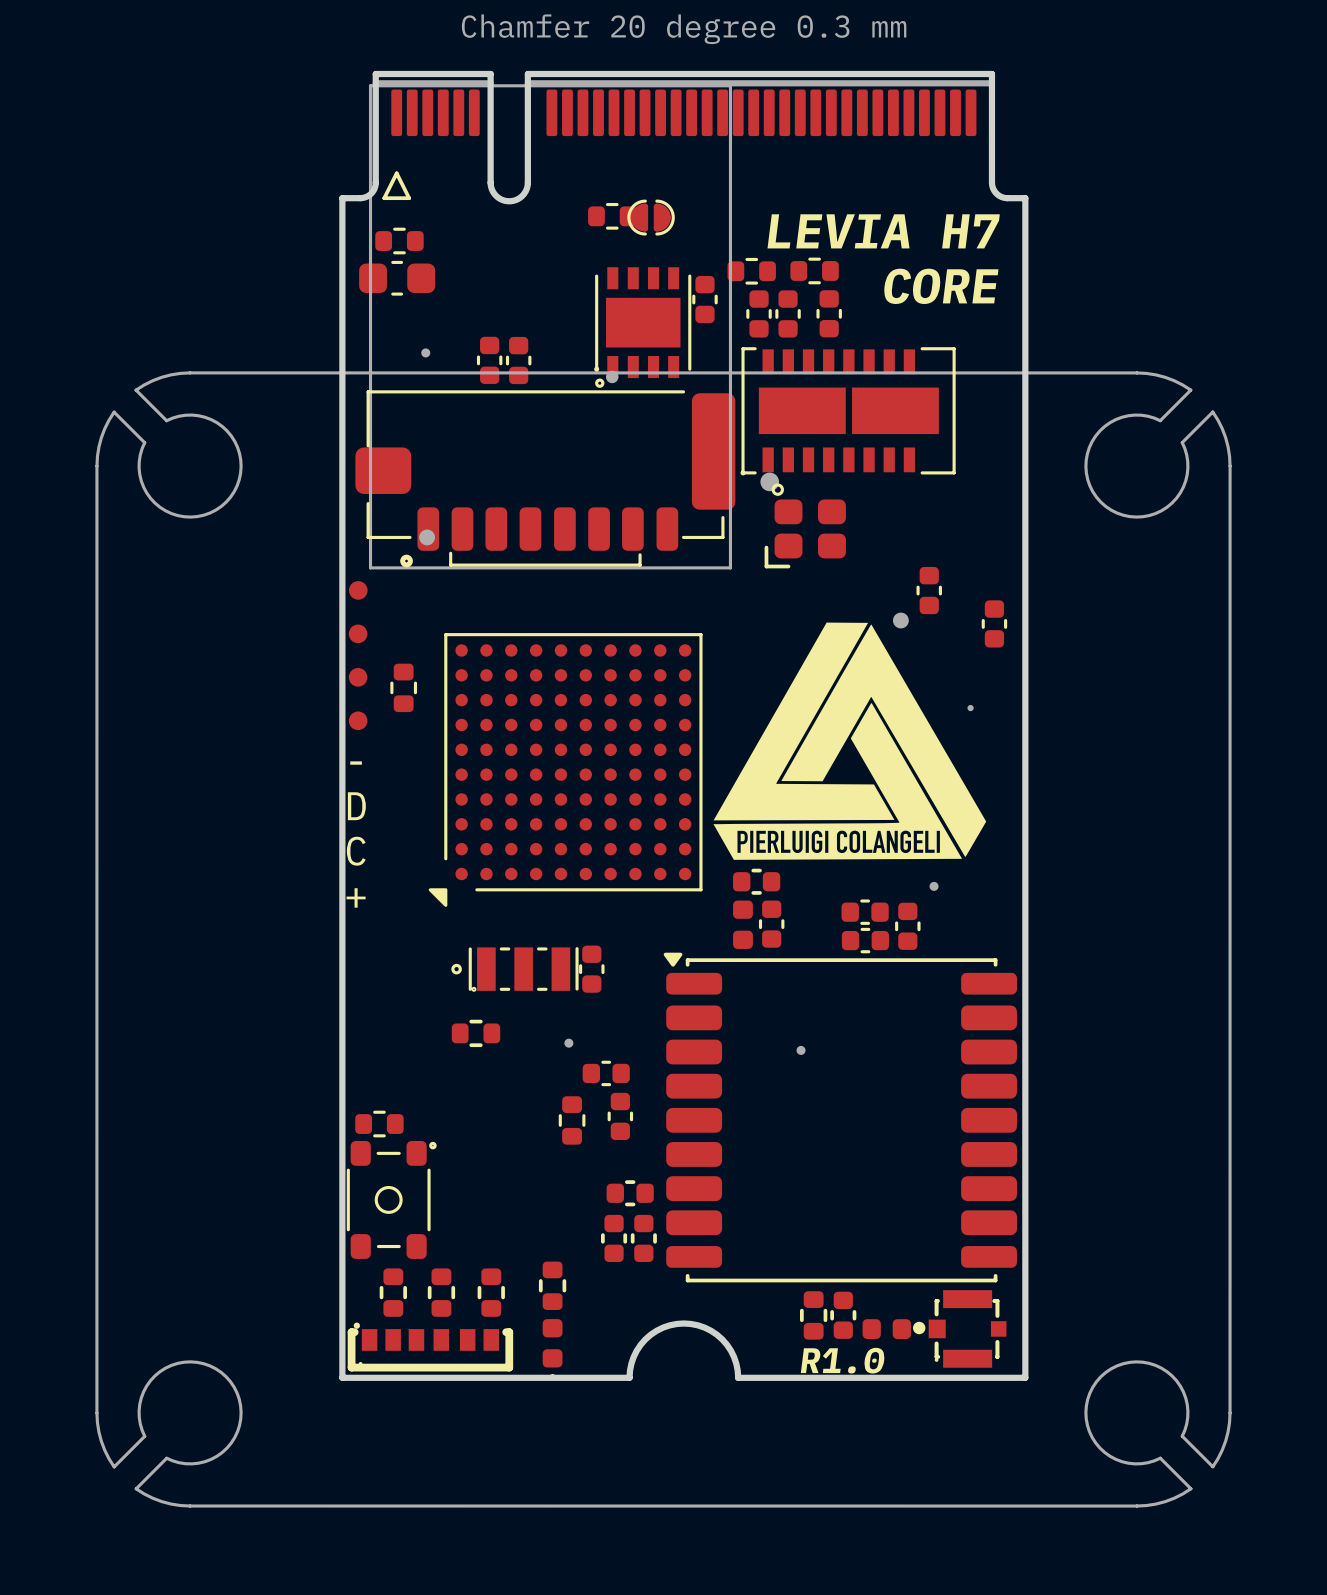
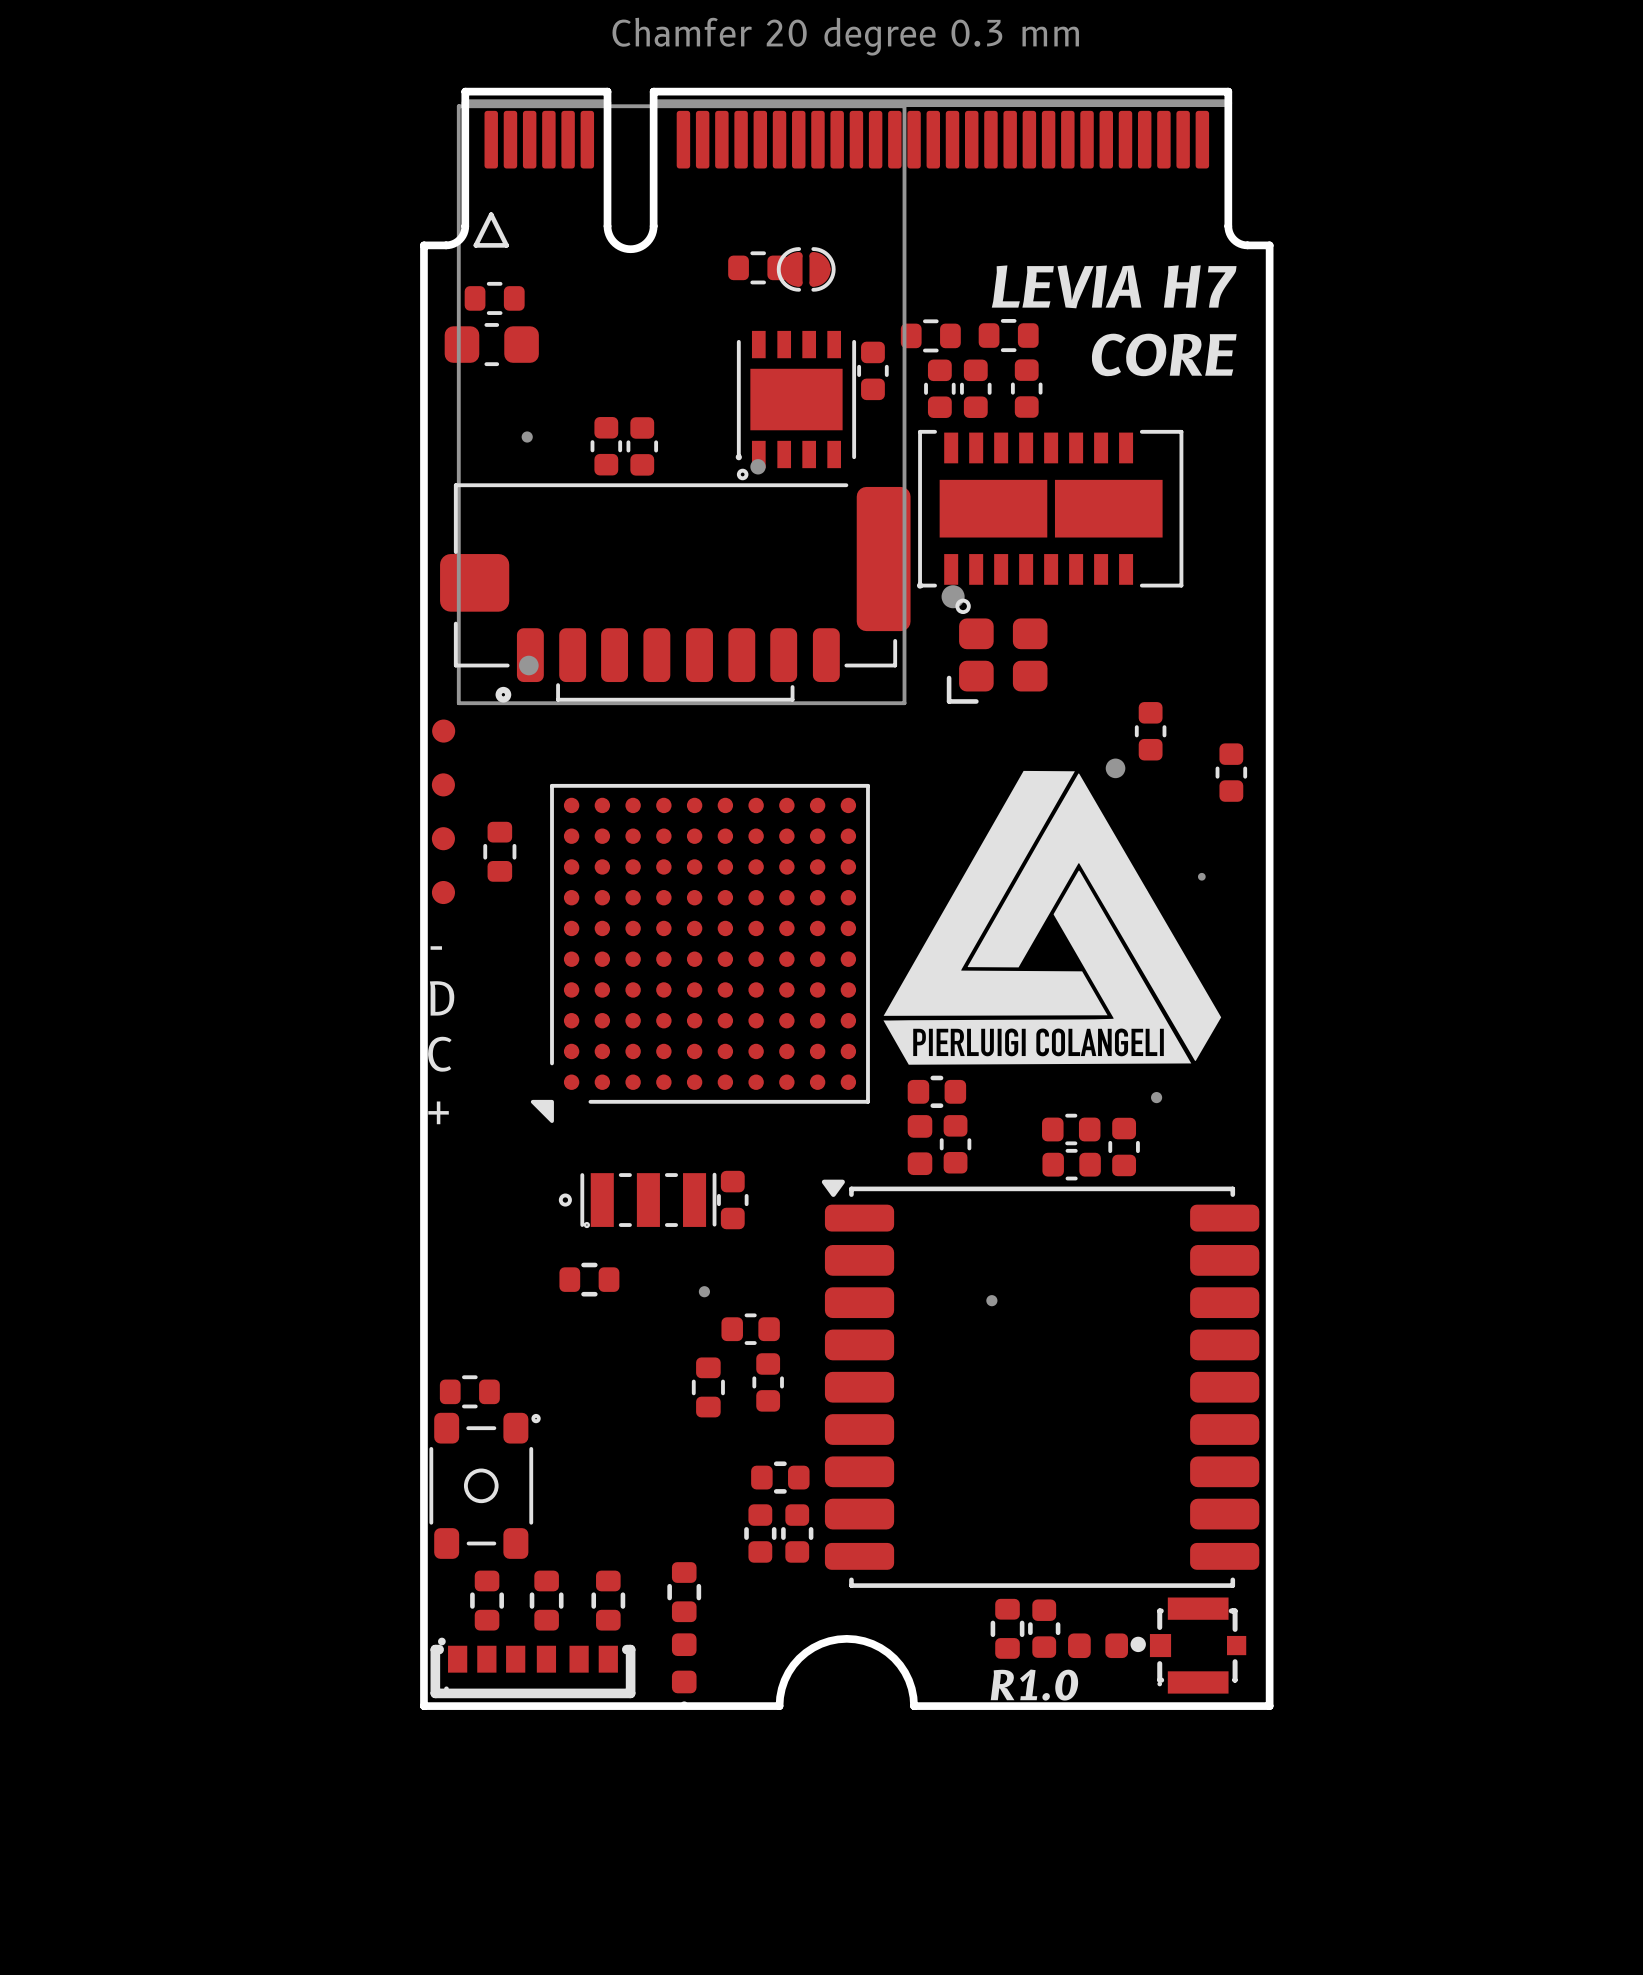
line: (190, 372) (1146, 373) (1165, 377) (1190, 390) (1160, 420) (1147, 416) (1134, 415) (1121, 417) (1110, 422) (1095, 435) (1089, 447) (1086, 460) (1087, 479) (1092, 491) (1100, 502) (1117, 513) (1136, 517) (1149, 515) (1161, 510) (1176, 498) (1183, 487) (1187, 474) (1186, 454) (1182, 442) (1212, 412) (1225, 437) (1230, 466) (1229, 1422) (1222, 1450) (1212, 1466) (1182, 1436) (1186, 1423) (1187, 1410) (1185, 1397) (1180, 1386) (1172, 1375) (1161, 1368) (1142, 1362) (1129, 1362) (1117, 1365) (1100, 1376) (1089, 1393) (1085, 1412) (1087, 1425) (1092, 1437) (1104, 1452) (1122, 1461) (1134, 1463) (1148, 1462) (1160, 1458) (1190, 1488) (1165, 1501) (1136, 1506) (180, 1505) (161, 1501) (136, 1488) (166, 1458) (179, 1462) (192, 1463) (205, 1461) (216, 1456) (227, 1447) (234, 1437) (240, 1418) (239, 1399) (230, 1381) (221, 1372) (209, 1365) (190, 1361) (171, 1365) (159, 1371) (150, 1380) (143, 1391) (139, 1410) (140, 1424) (144, 1436) (114, 1466) (101, 1441) (96, 1412) (97, 456) (104, 428) (114, 412) (144, 442) (139, 461) (141, 480) (150, 498) (160, 507) (177, 515) (197, 516) (209, 513) (226, 502) (237, 485) (241, 466) (239, 453) (231, 435) (216, 422) (204, 417) (185, 415) (166, 420) (136, 390) (161, 377) (190, 372) -> none

